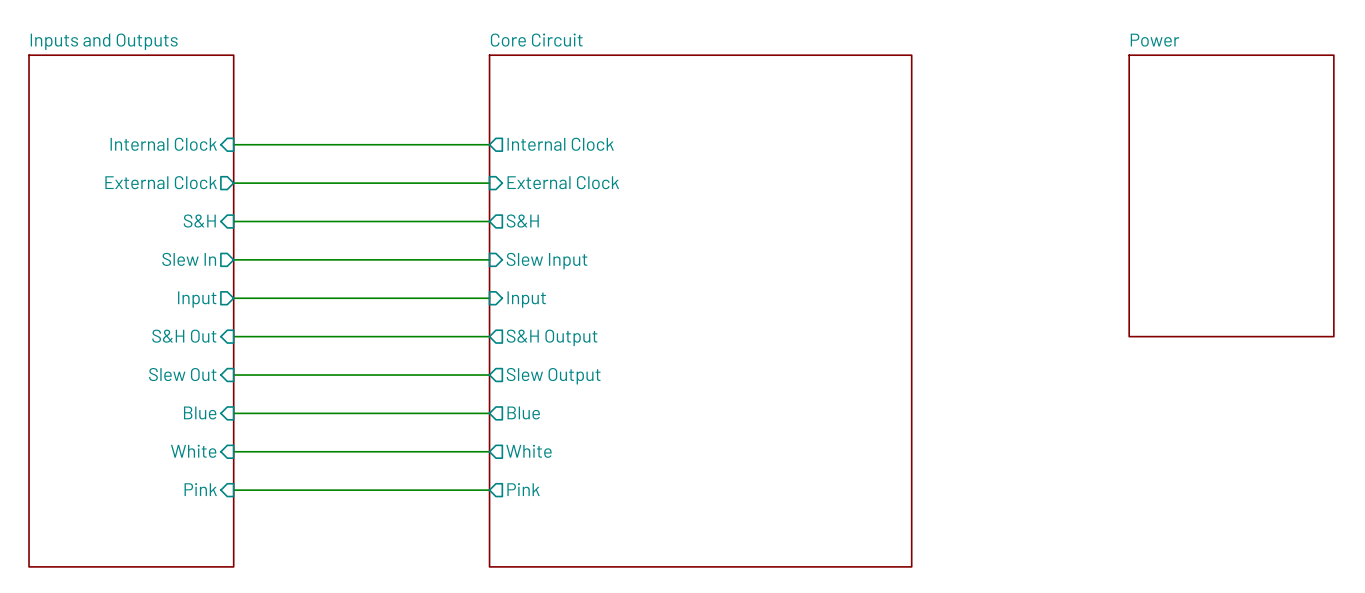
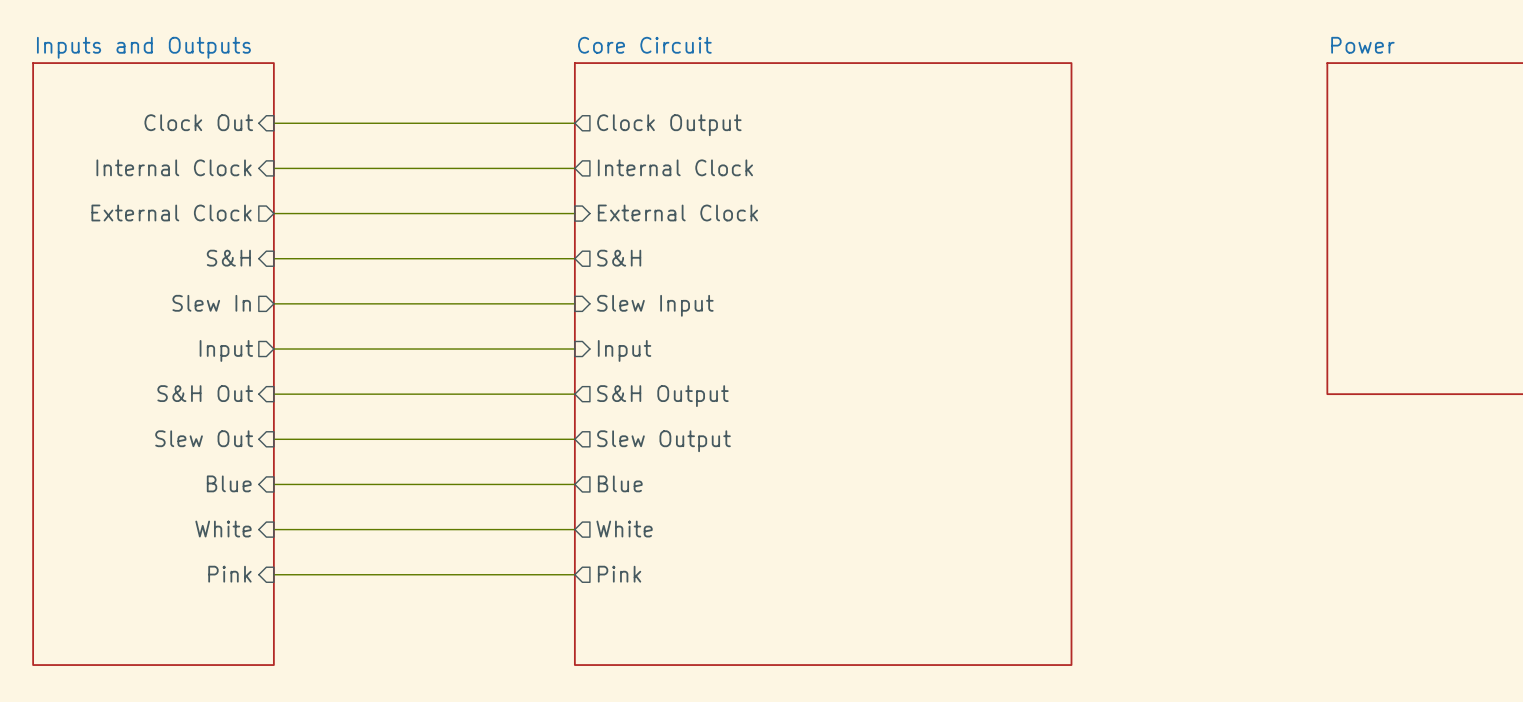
sheet pin: none -> Clock Out (198, 122)
wire: none -> (273, 123) (574, 123)
sheet pin: none -> Clock Output (669, 125)

